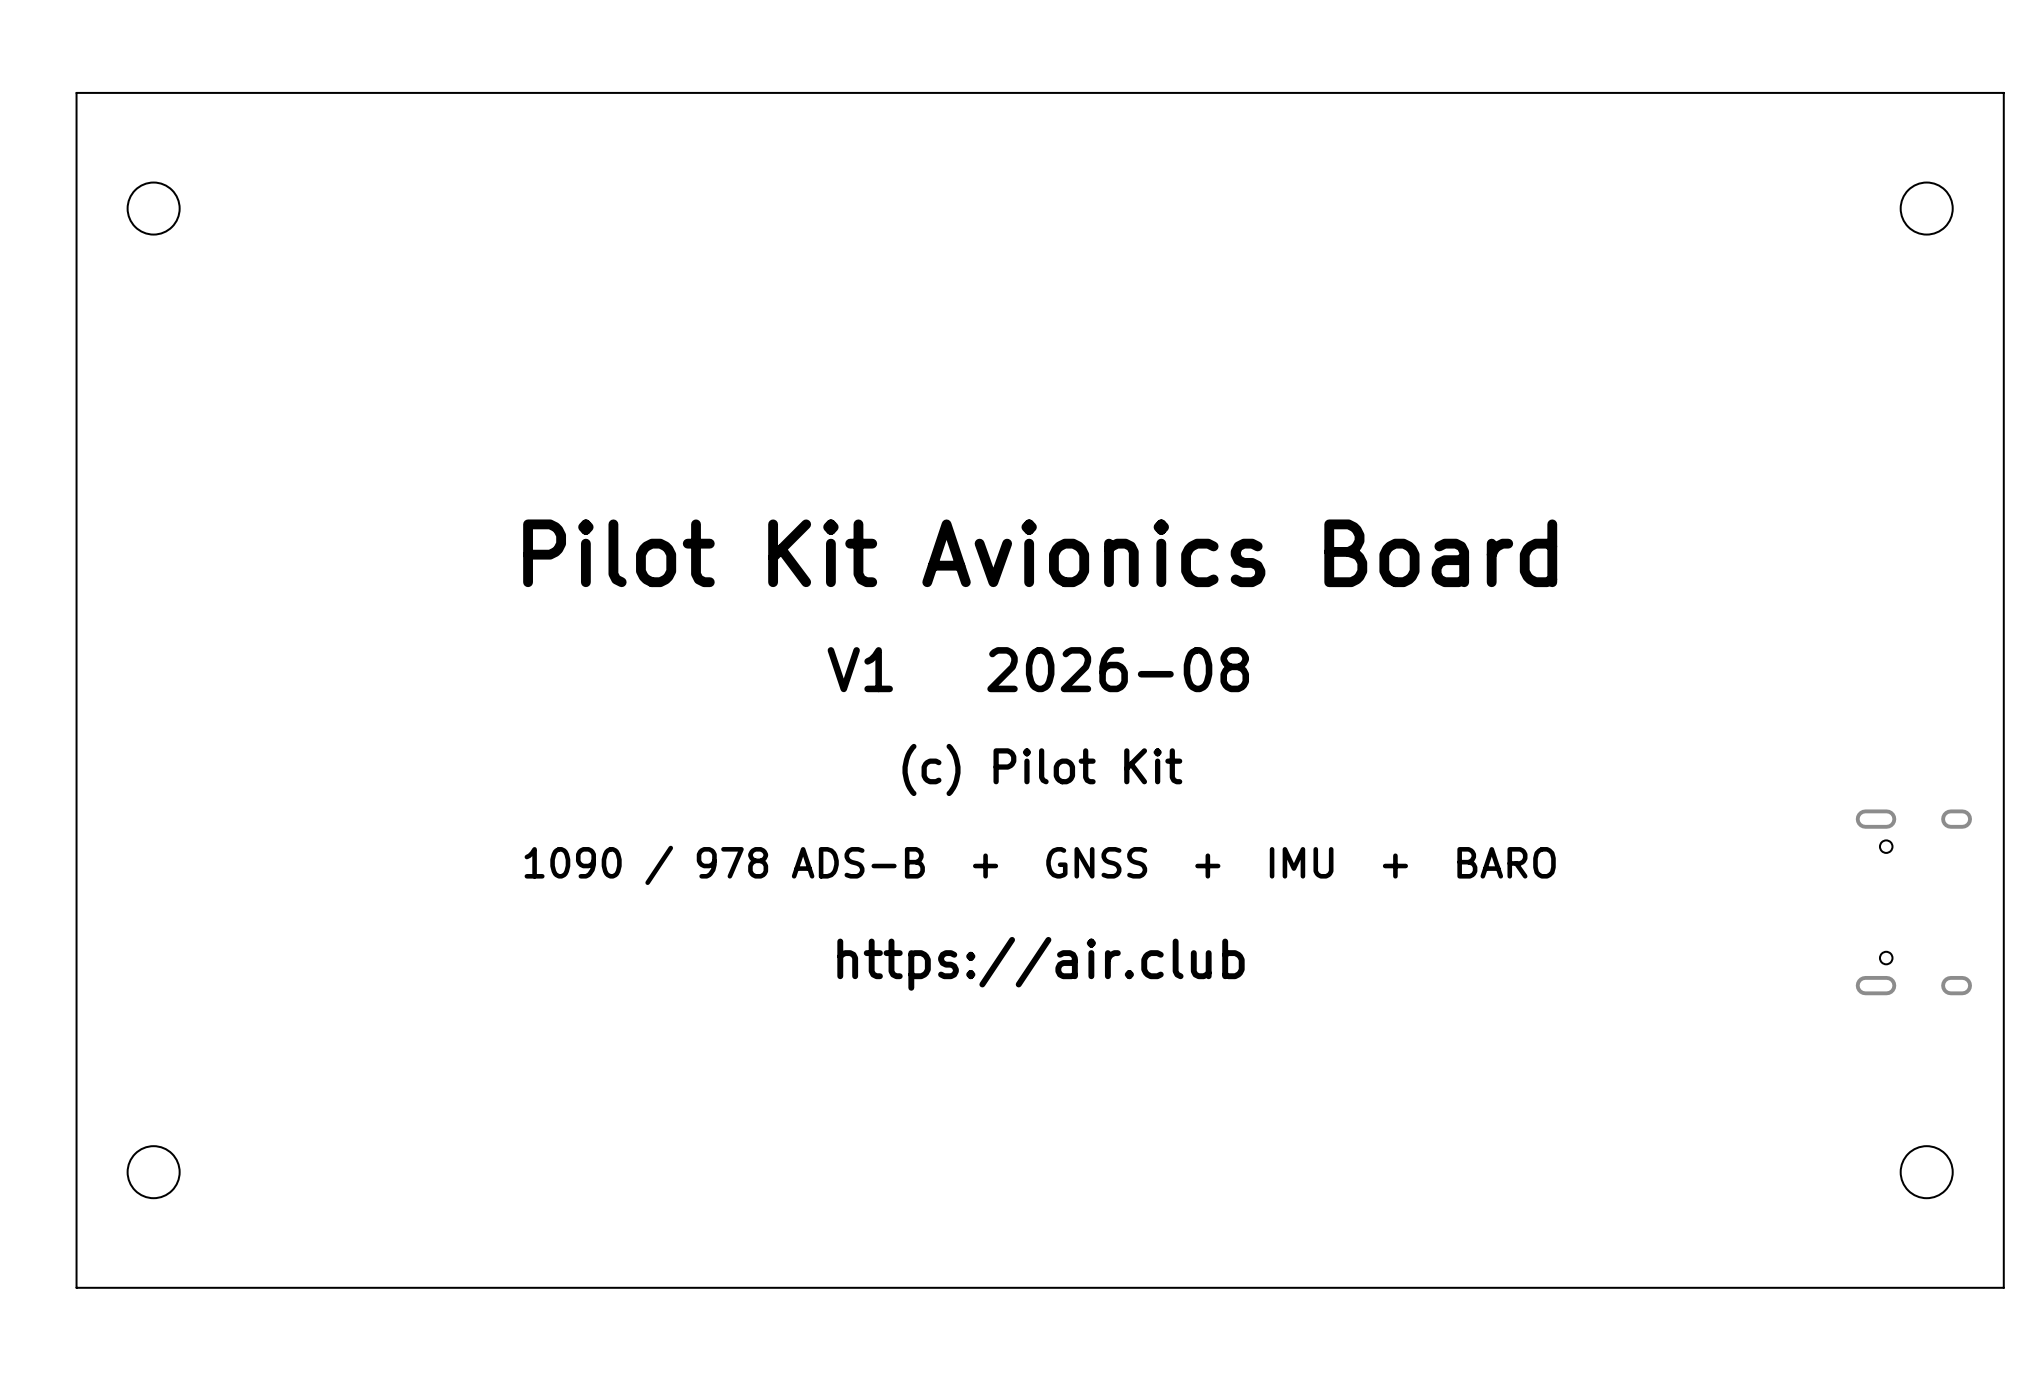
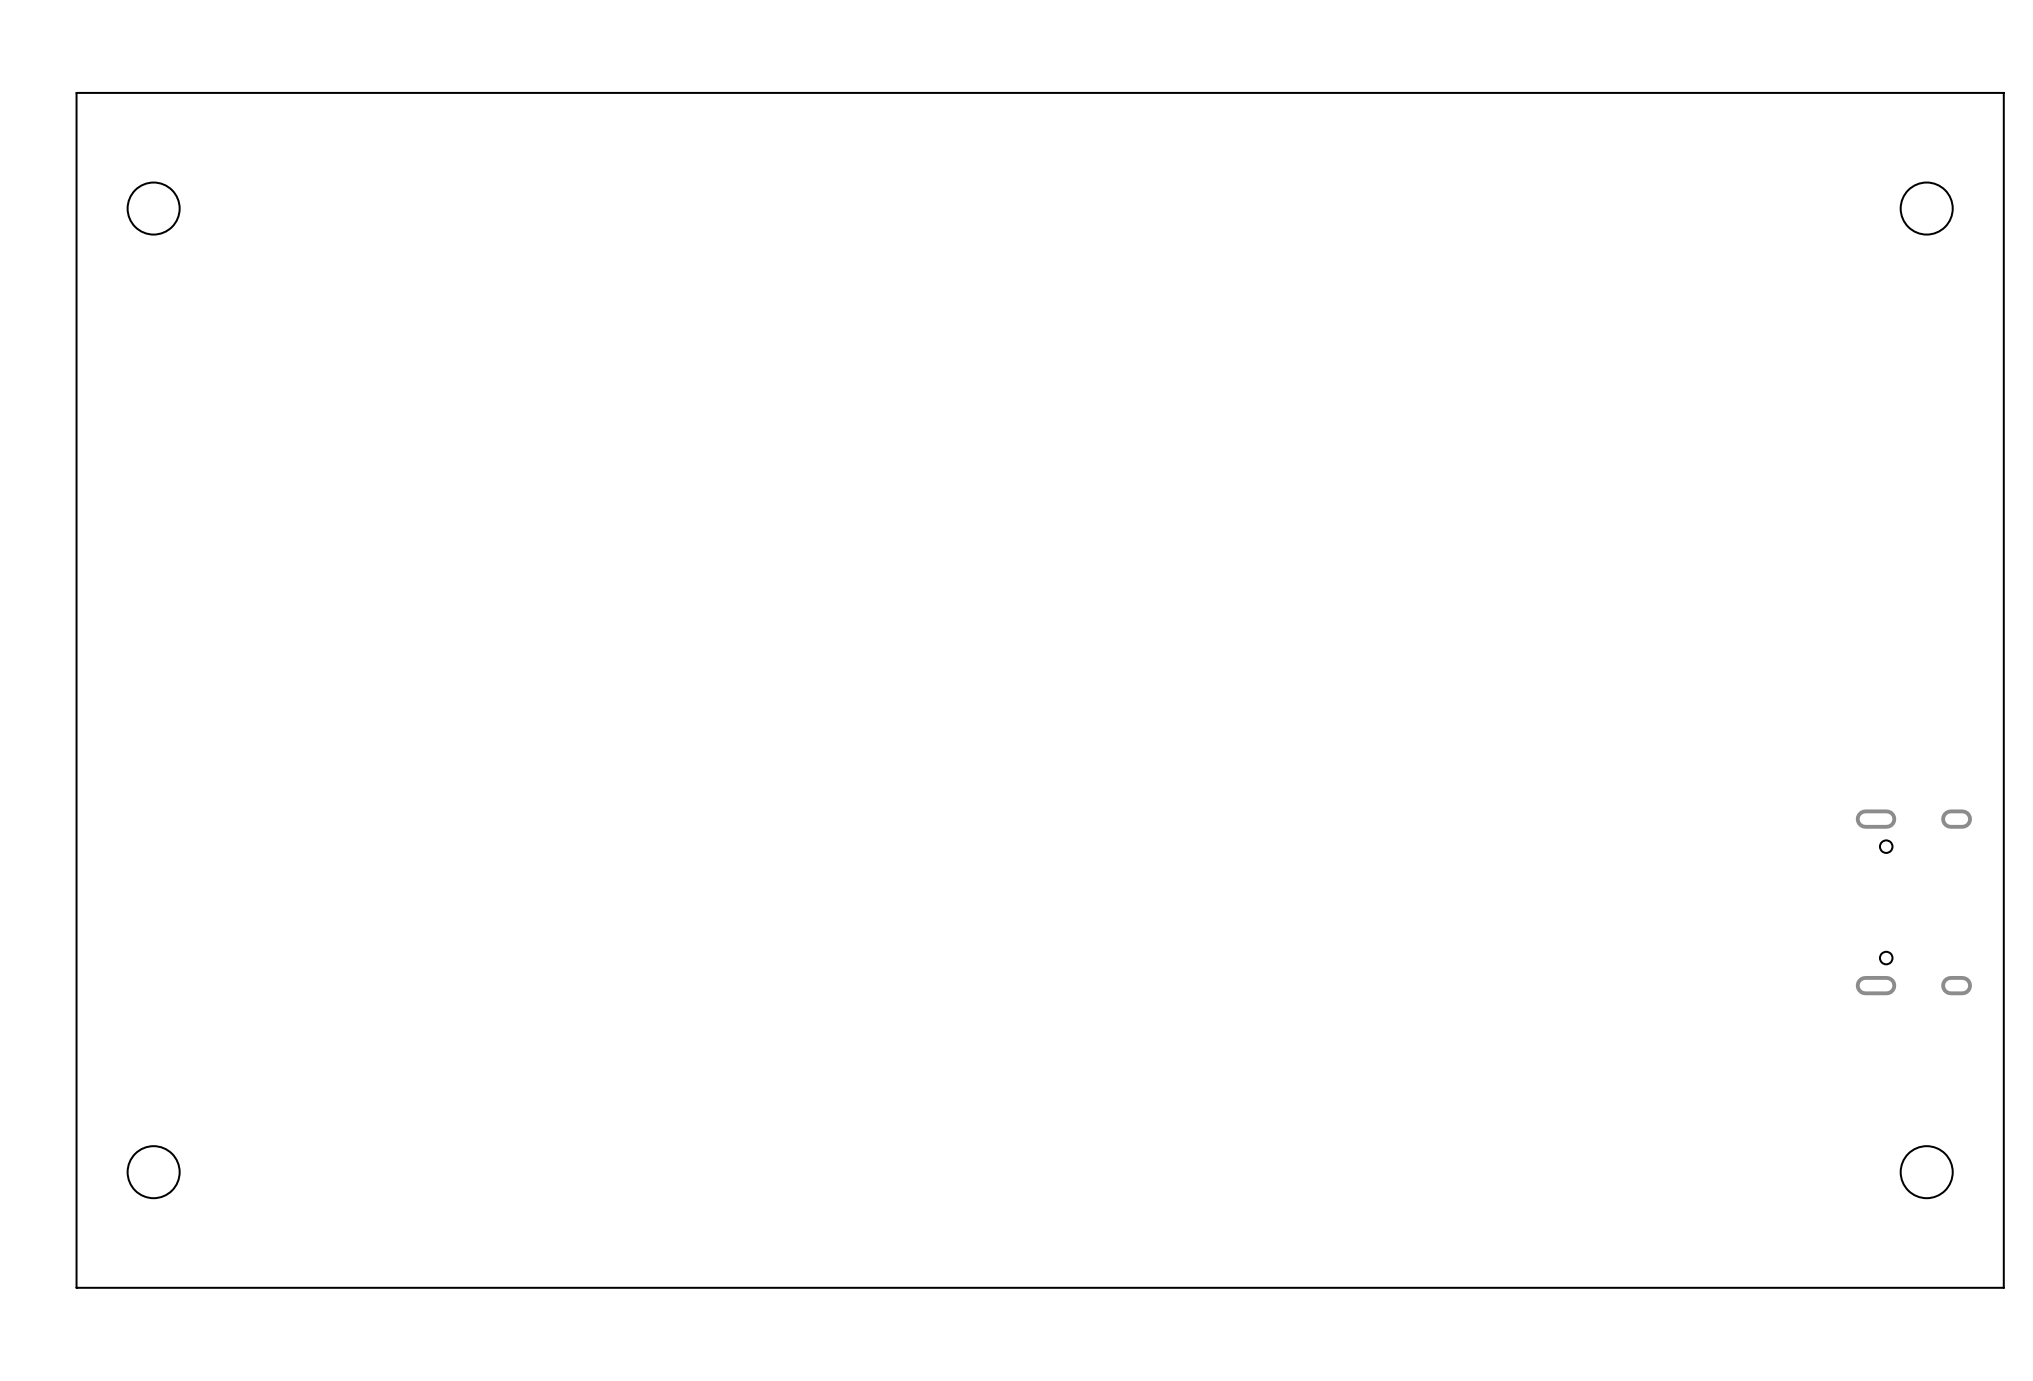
text: Pilot Kit Avionics Board (1040, 553) -> none
text: V1 2026-08 (1038, 669) -> none
text: (c) Pilot Kit (1042, 769) -> none
text: 1090 / 978 ADS-B + GNSS + IMU + BARO (1040, 865) -> none
text: https://air.club (1040, 963) -> none

